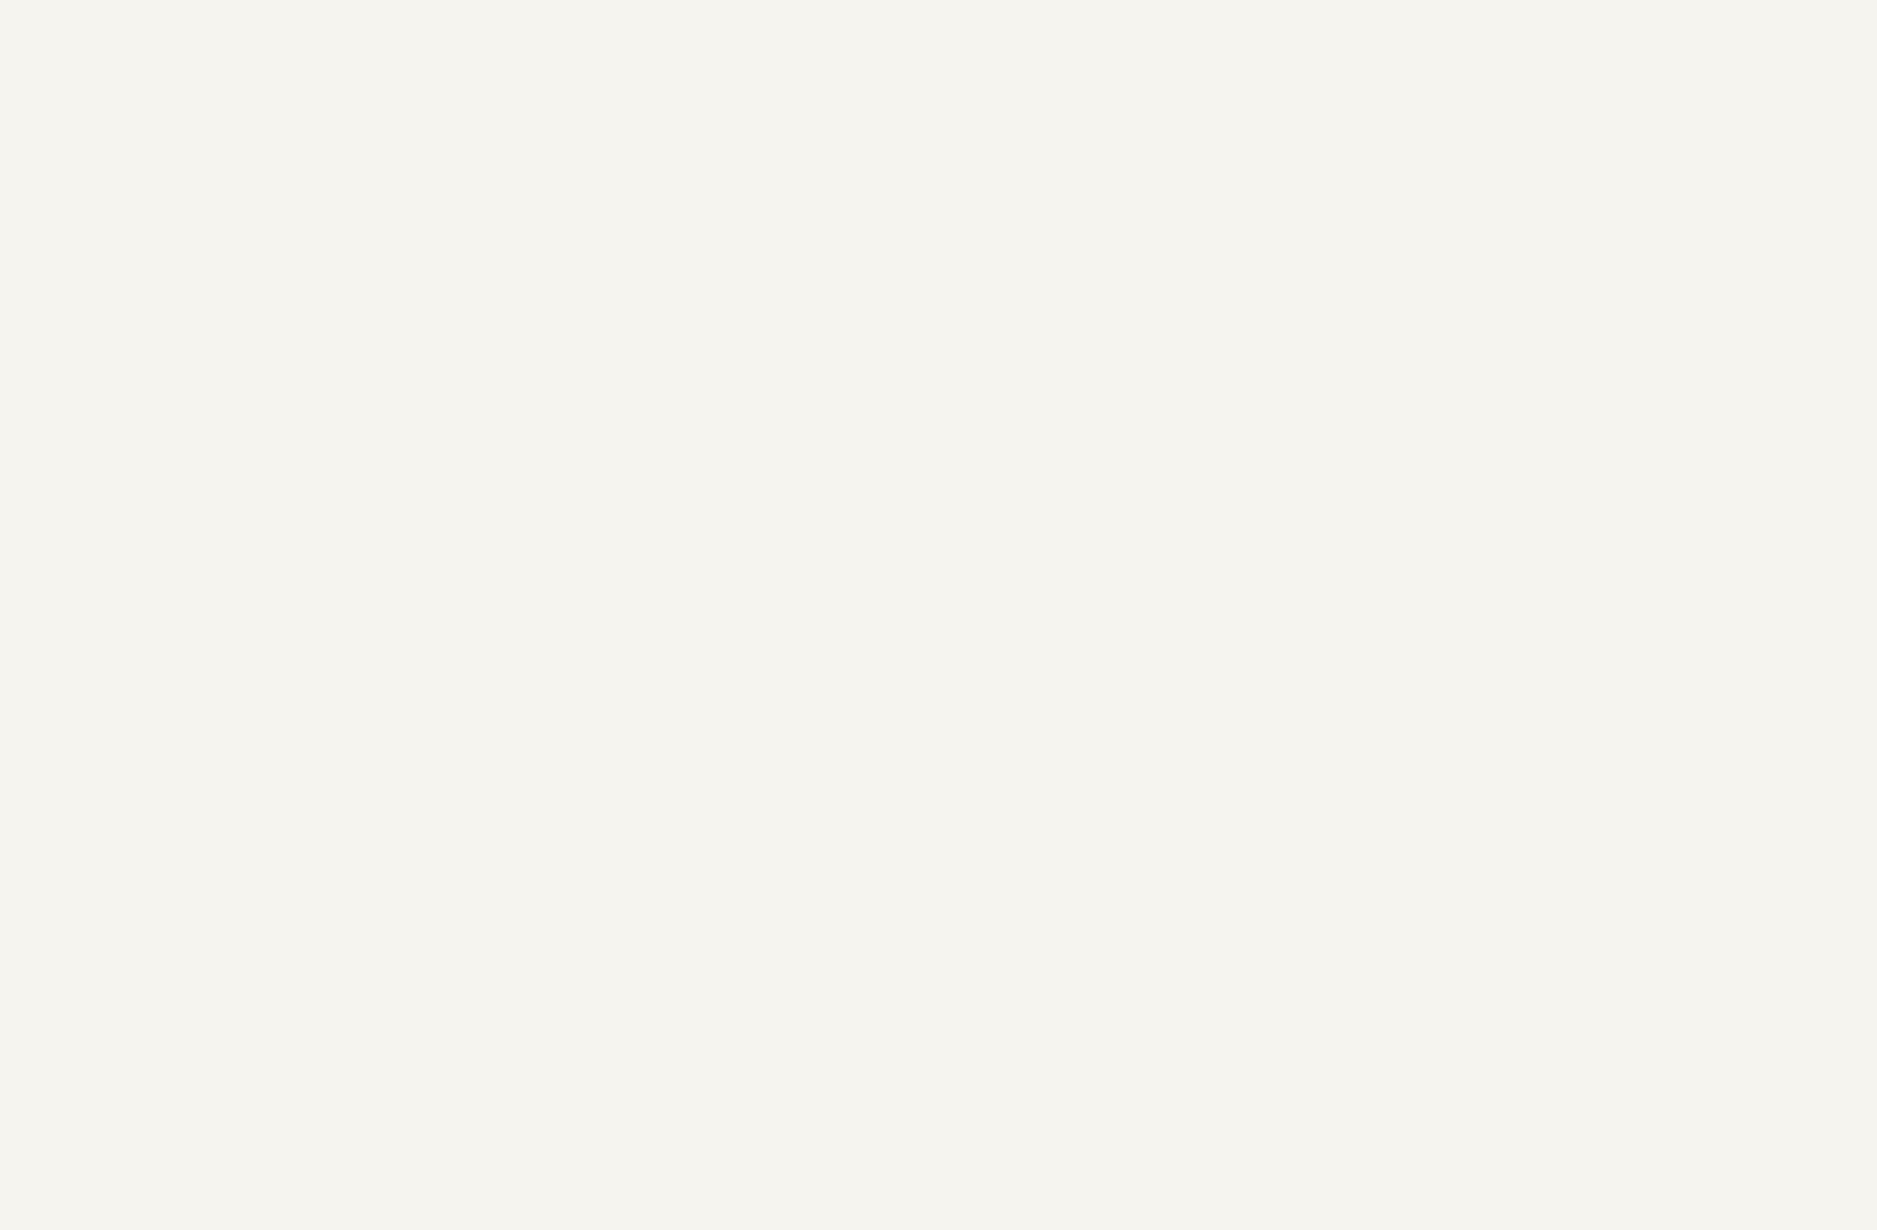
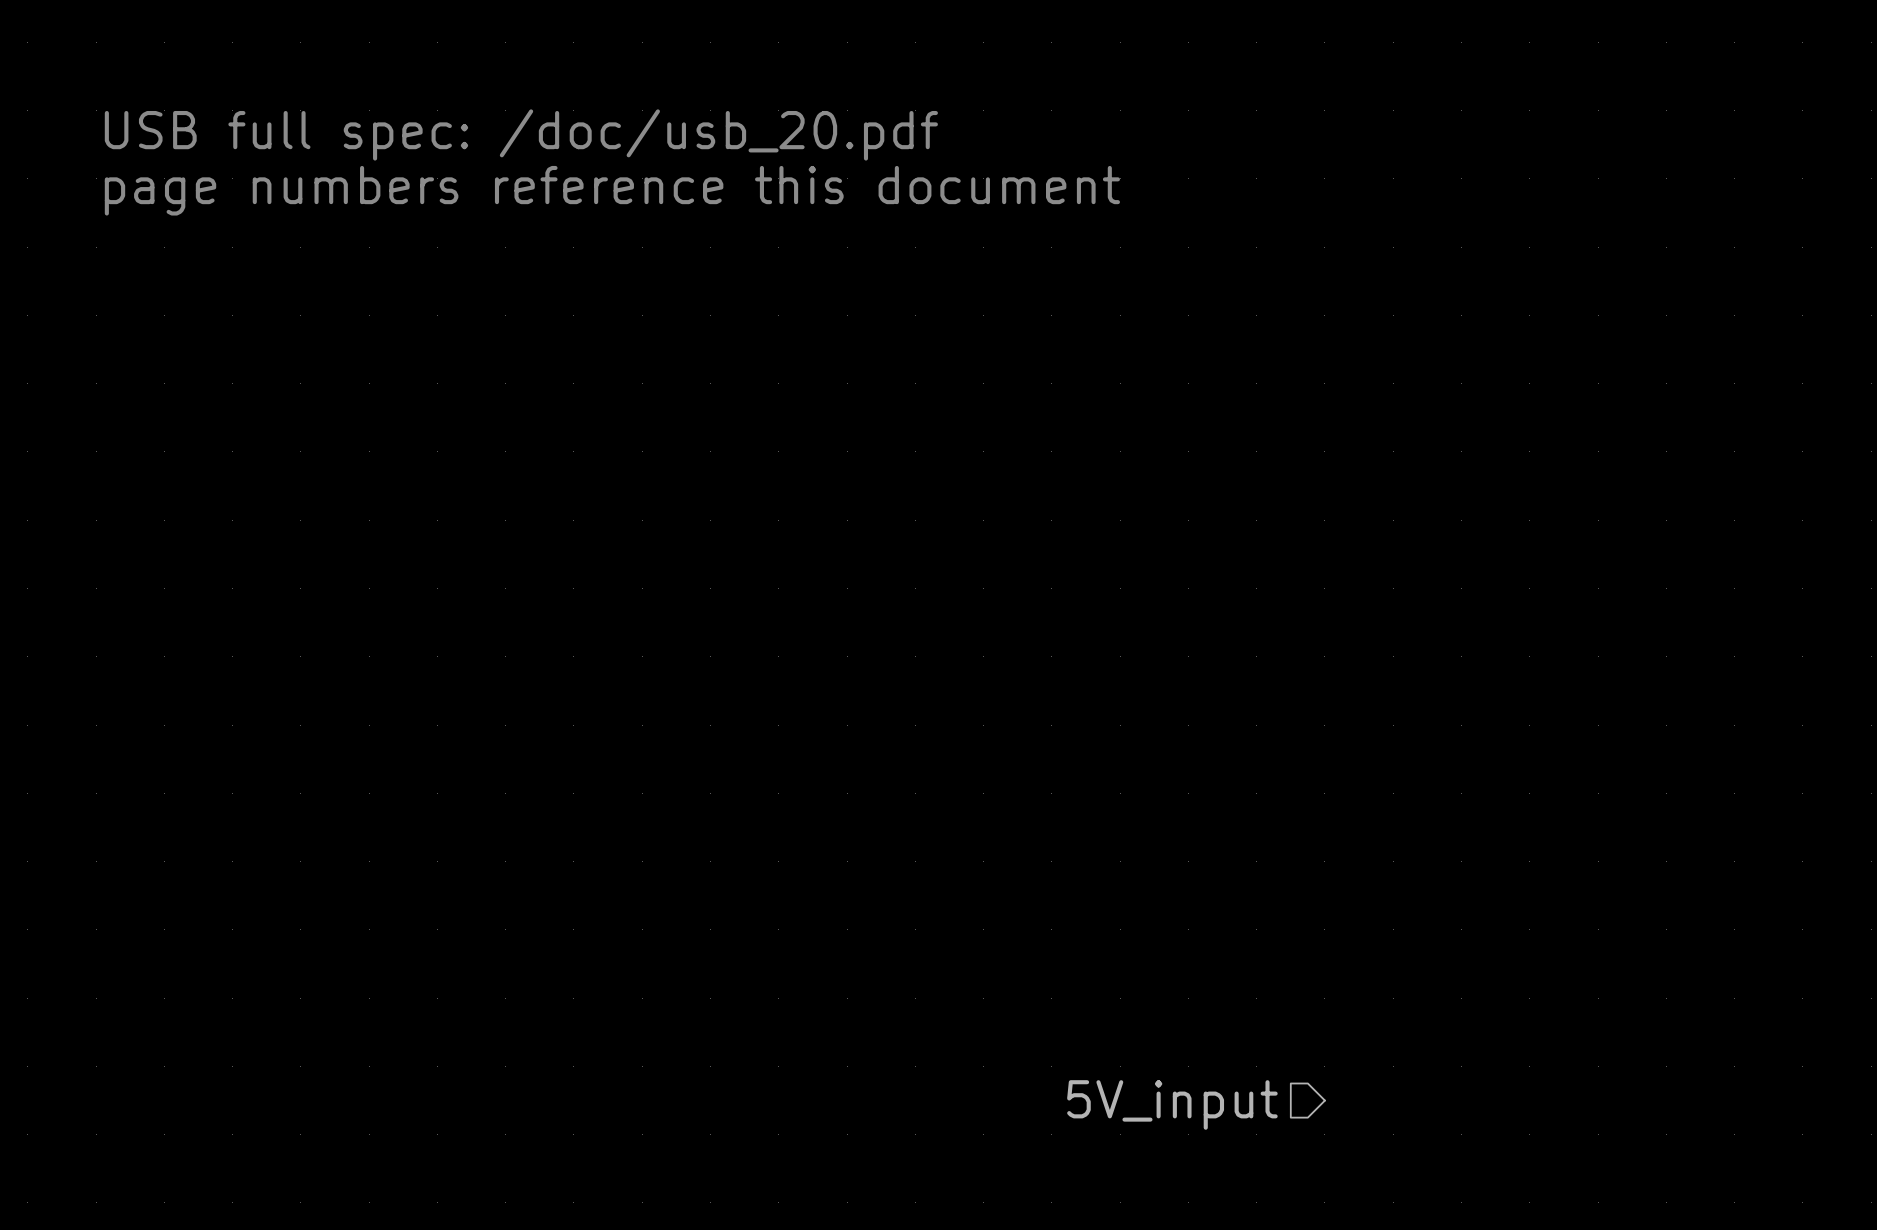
text: none -> USB full spec: /doc/usb_20.pdf (521, 134)
text: none -> page numbers reference this document (612, 190)
hierarchical label: none -> 5V_input (1172, 1104)

